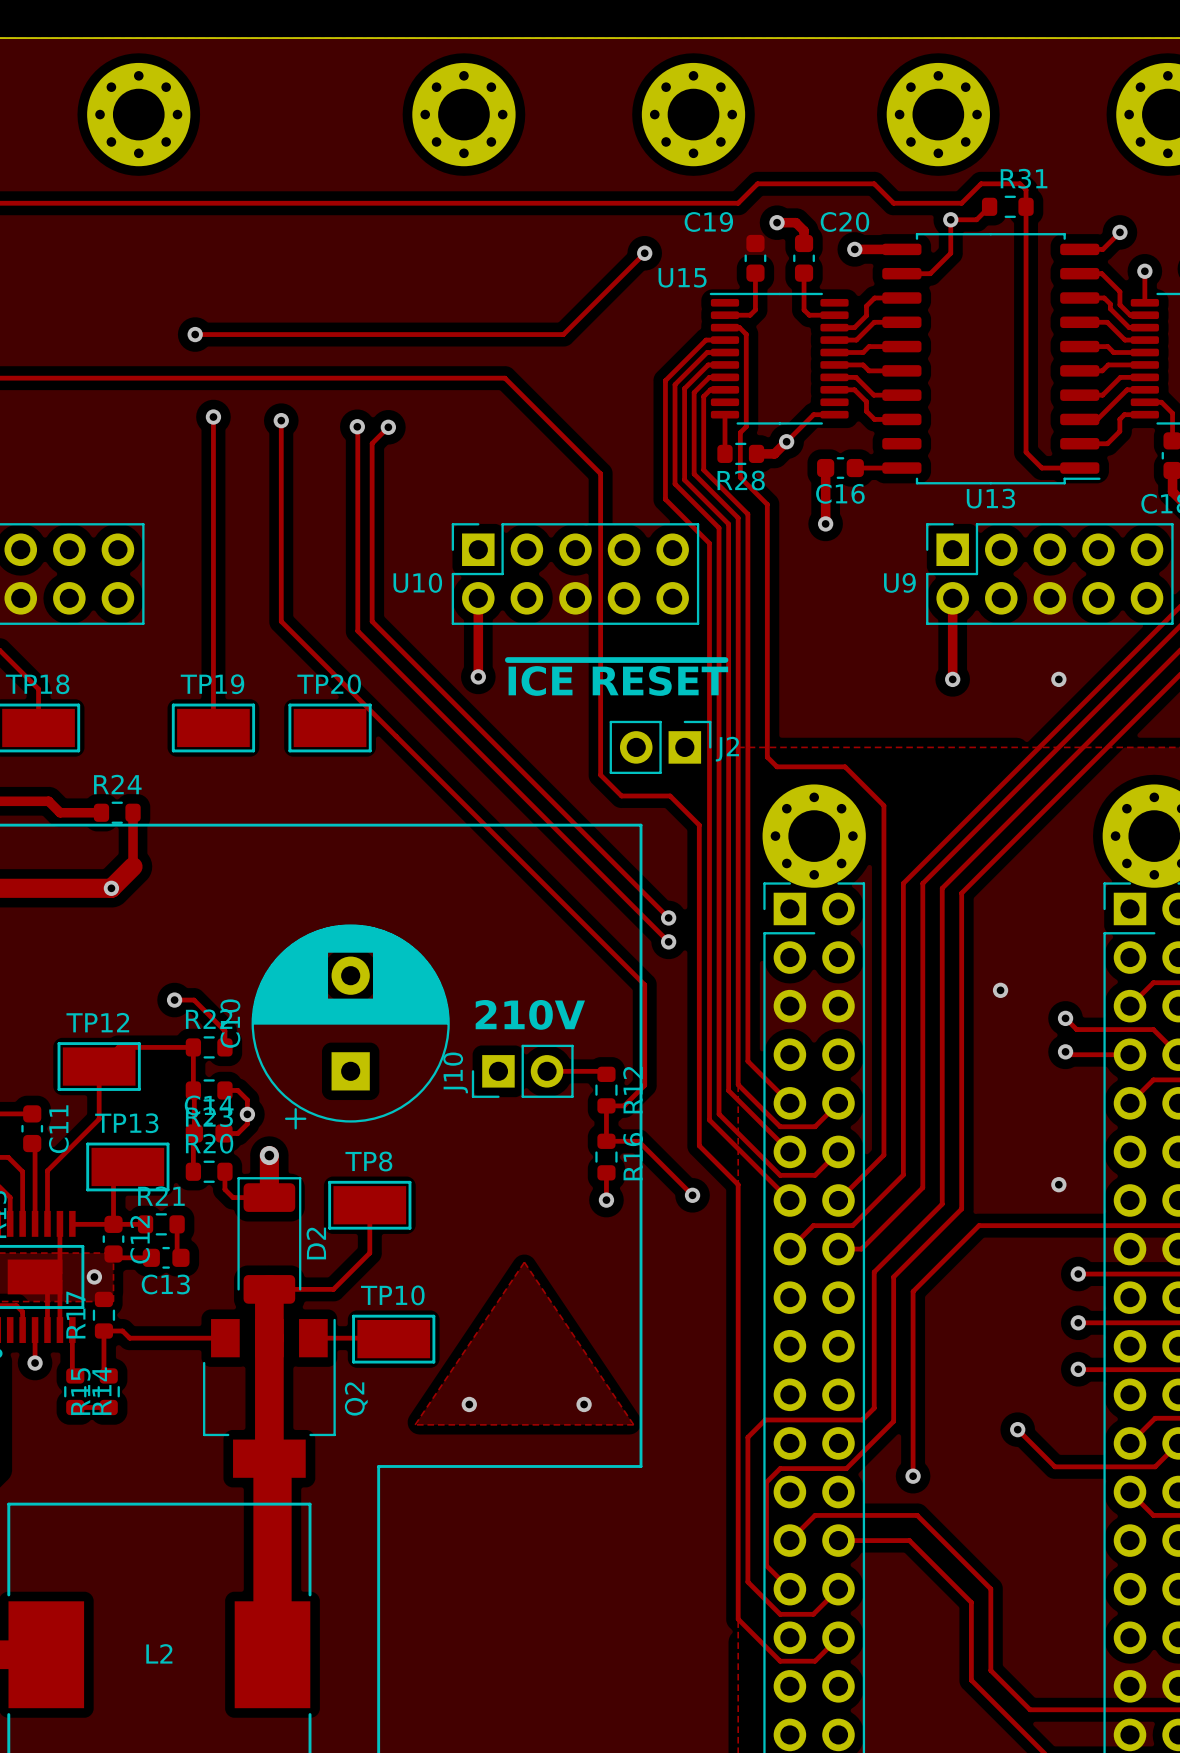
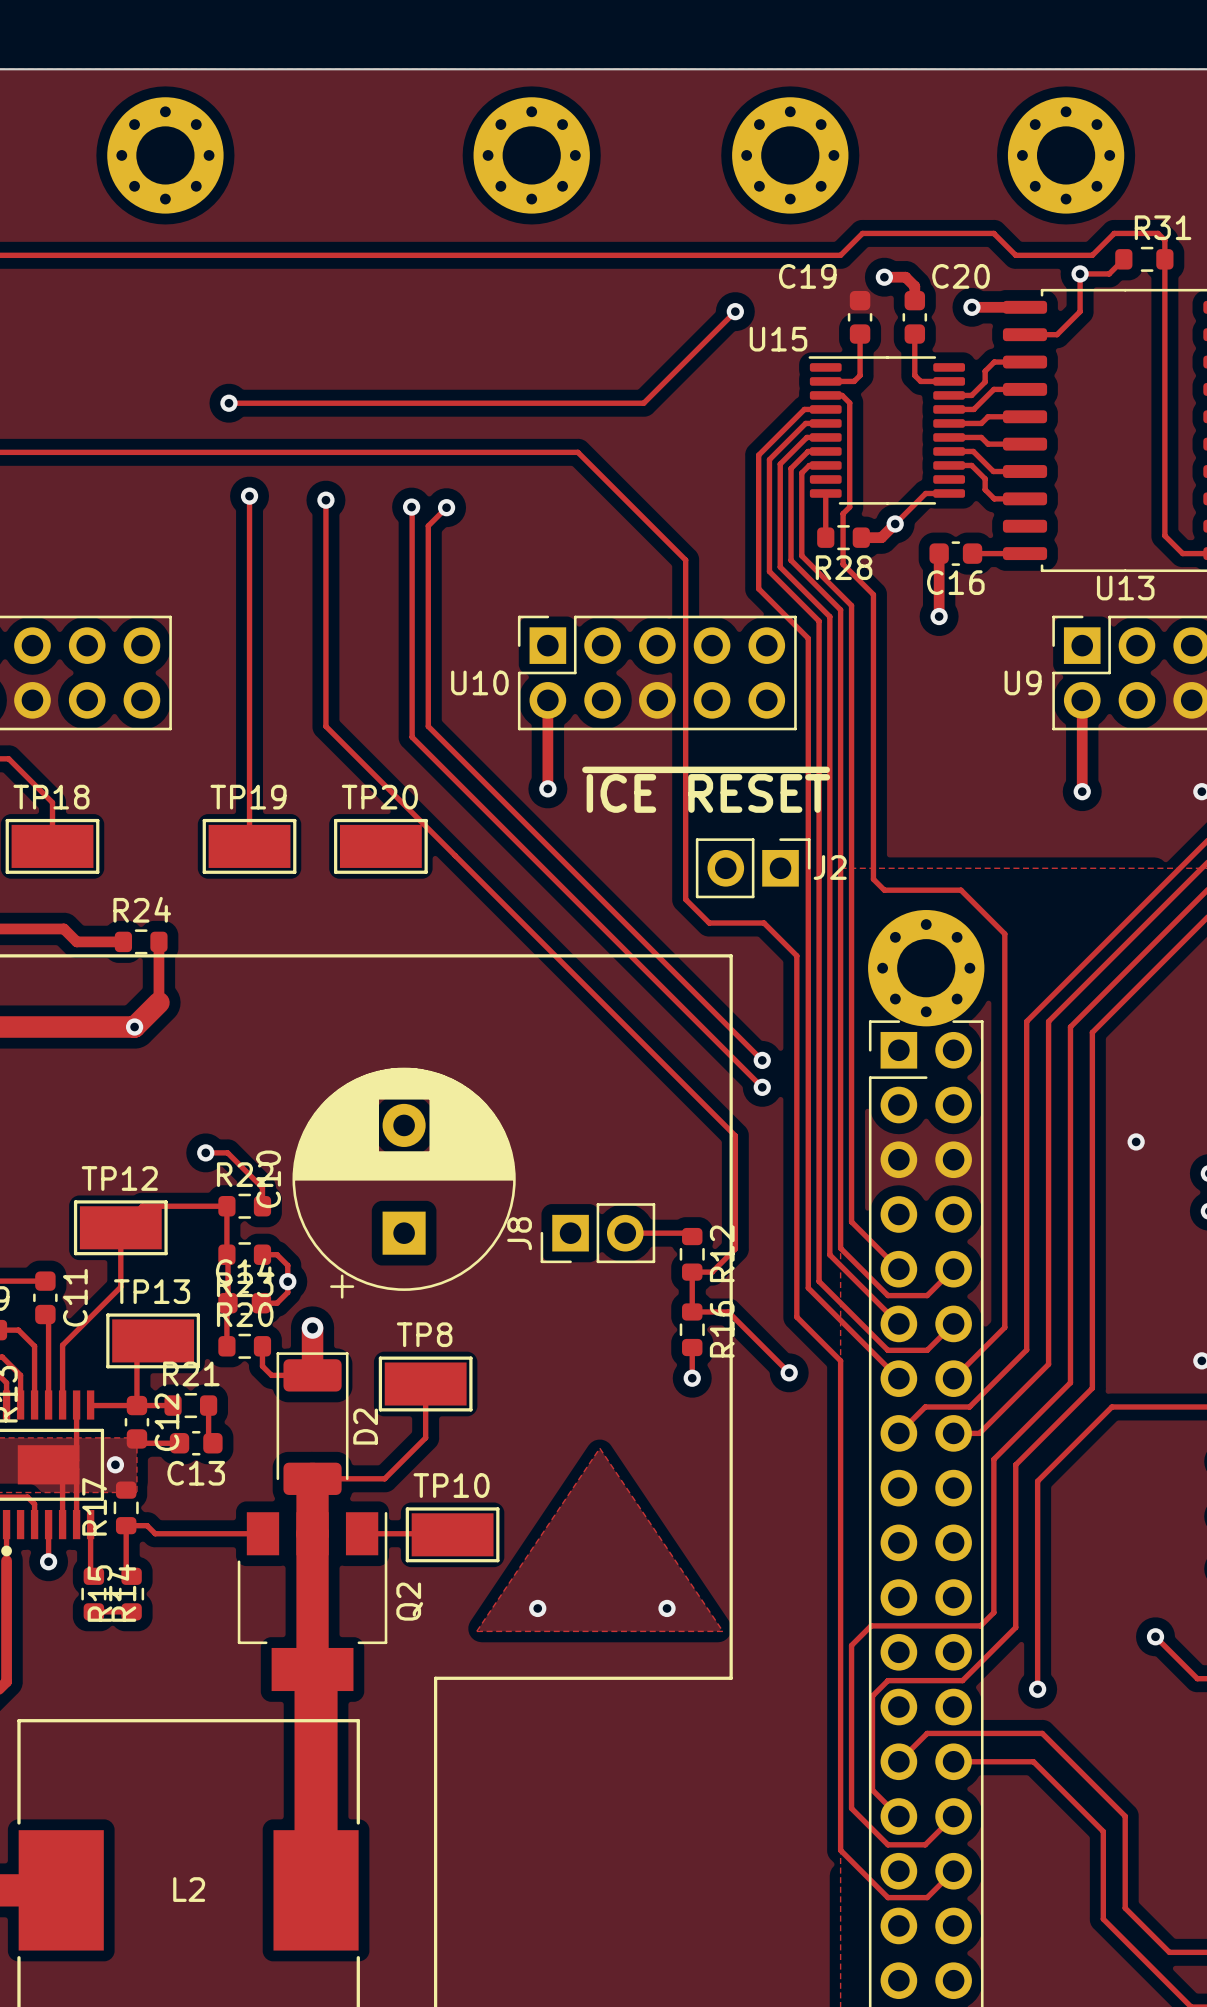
text: 210V (530, 1014) -> none
J10 name: J10 (455, 1072) -> J8 (519, 1233)

